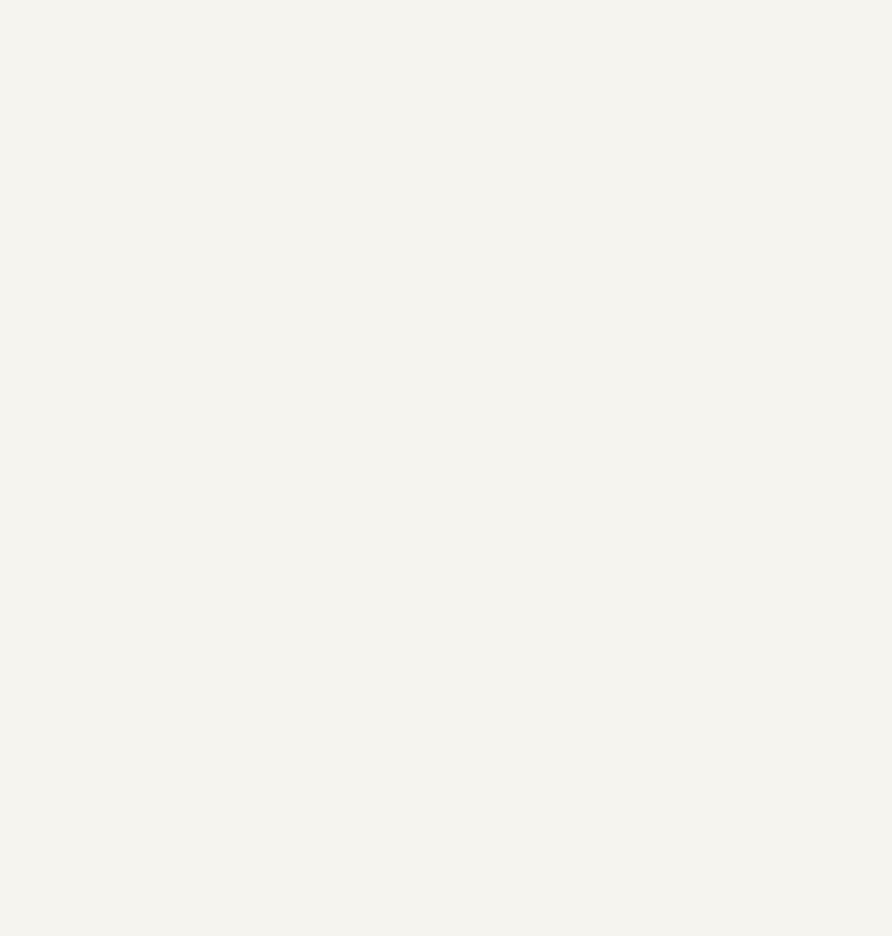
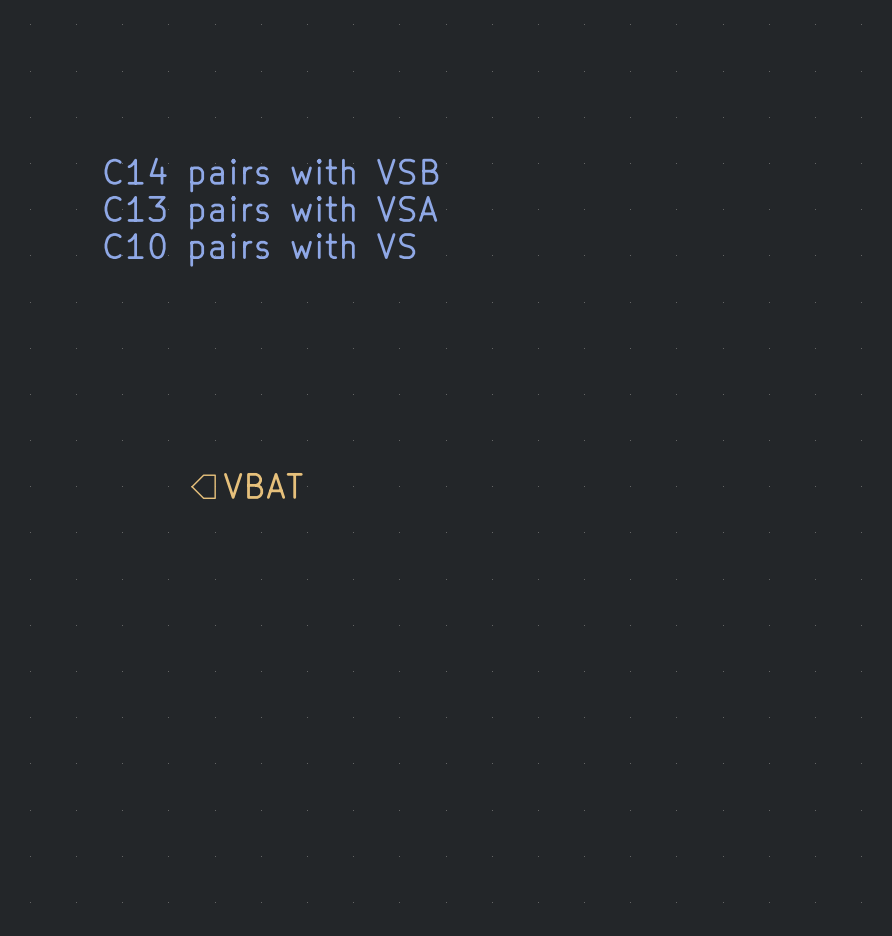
text: none -> C14 pairs with VSB (271, 175)
text: none -> C13 pairs with VSA (270, 212)
text: none -> C10 pairs with VS (259, 249)
hierarchical label: none -> VBAT (263, 485)

